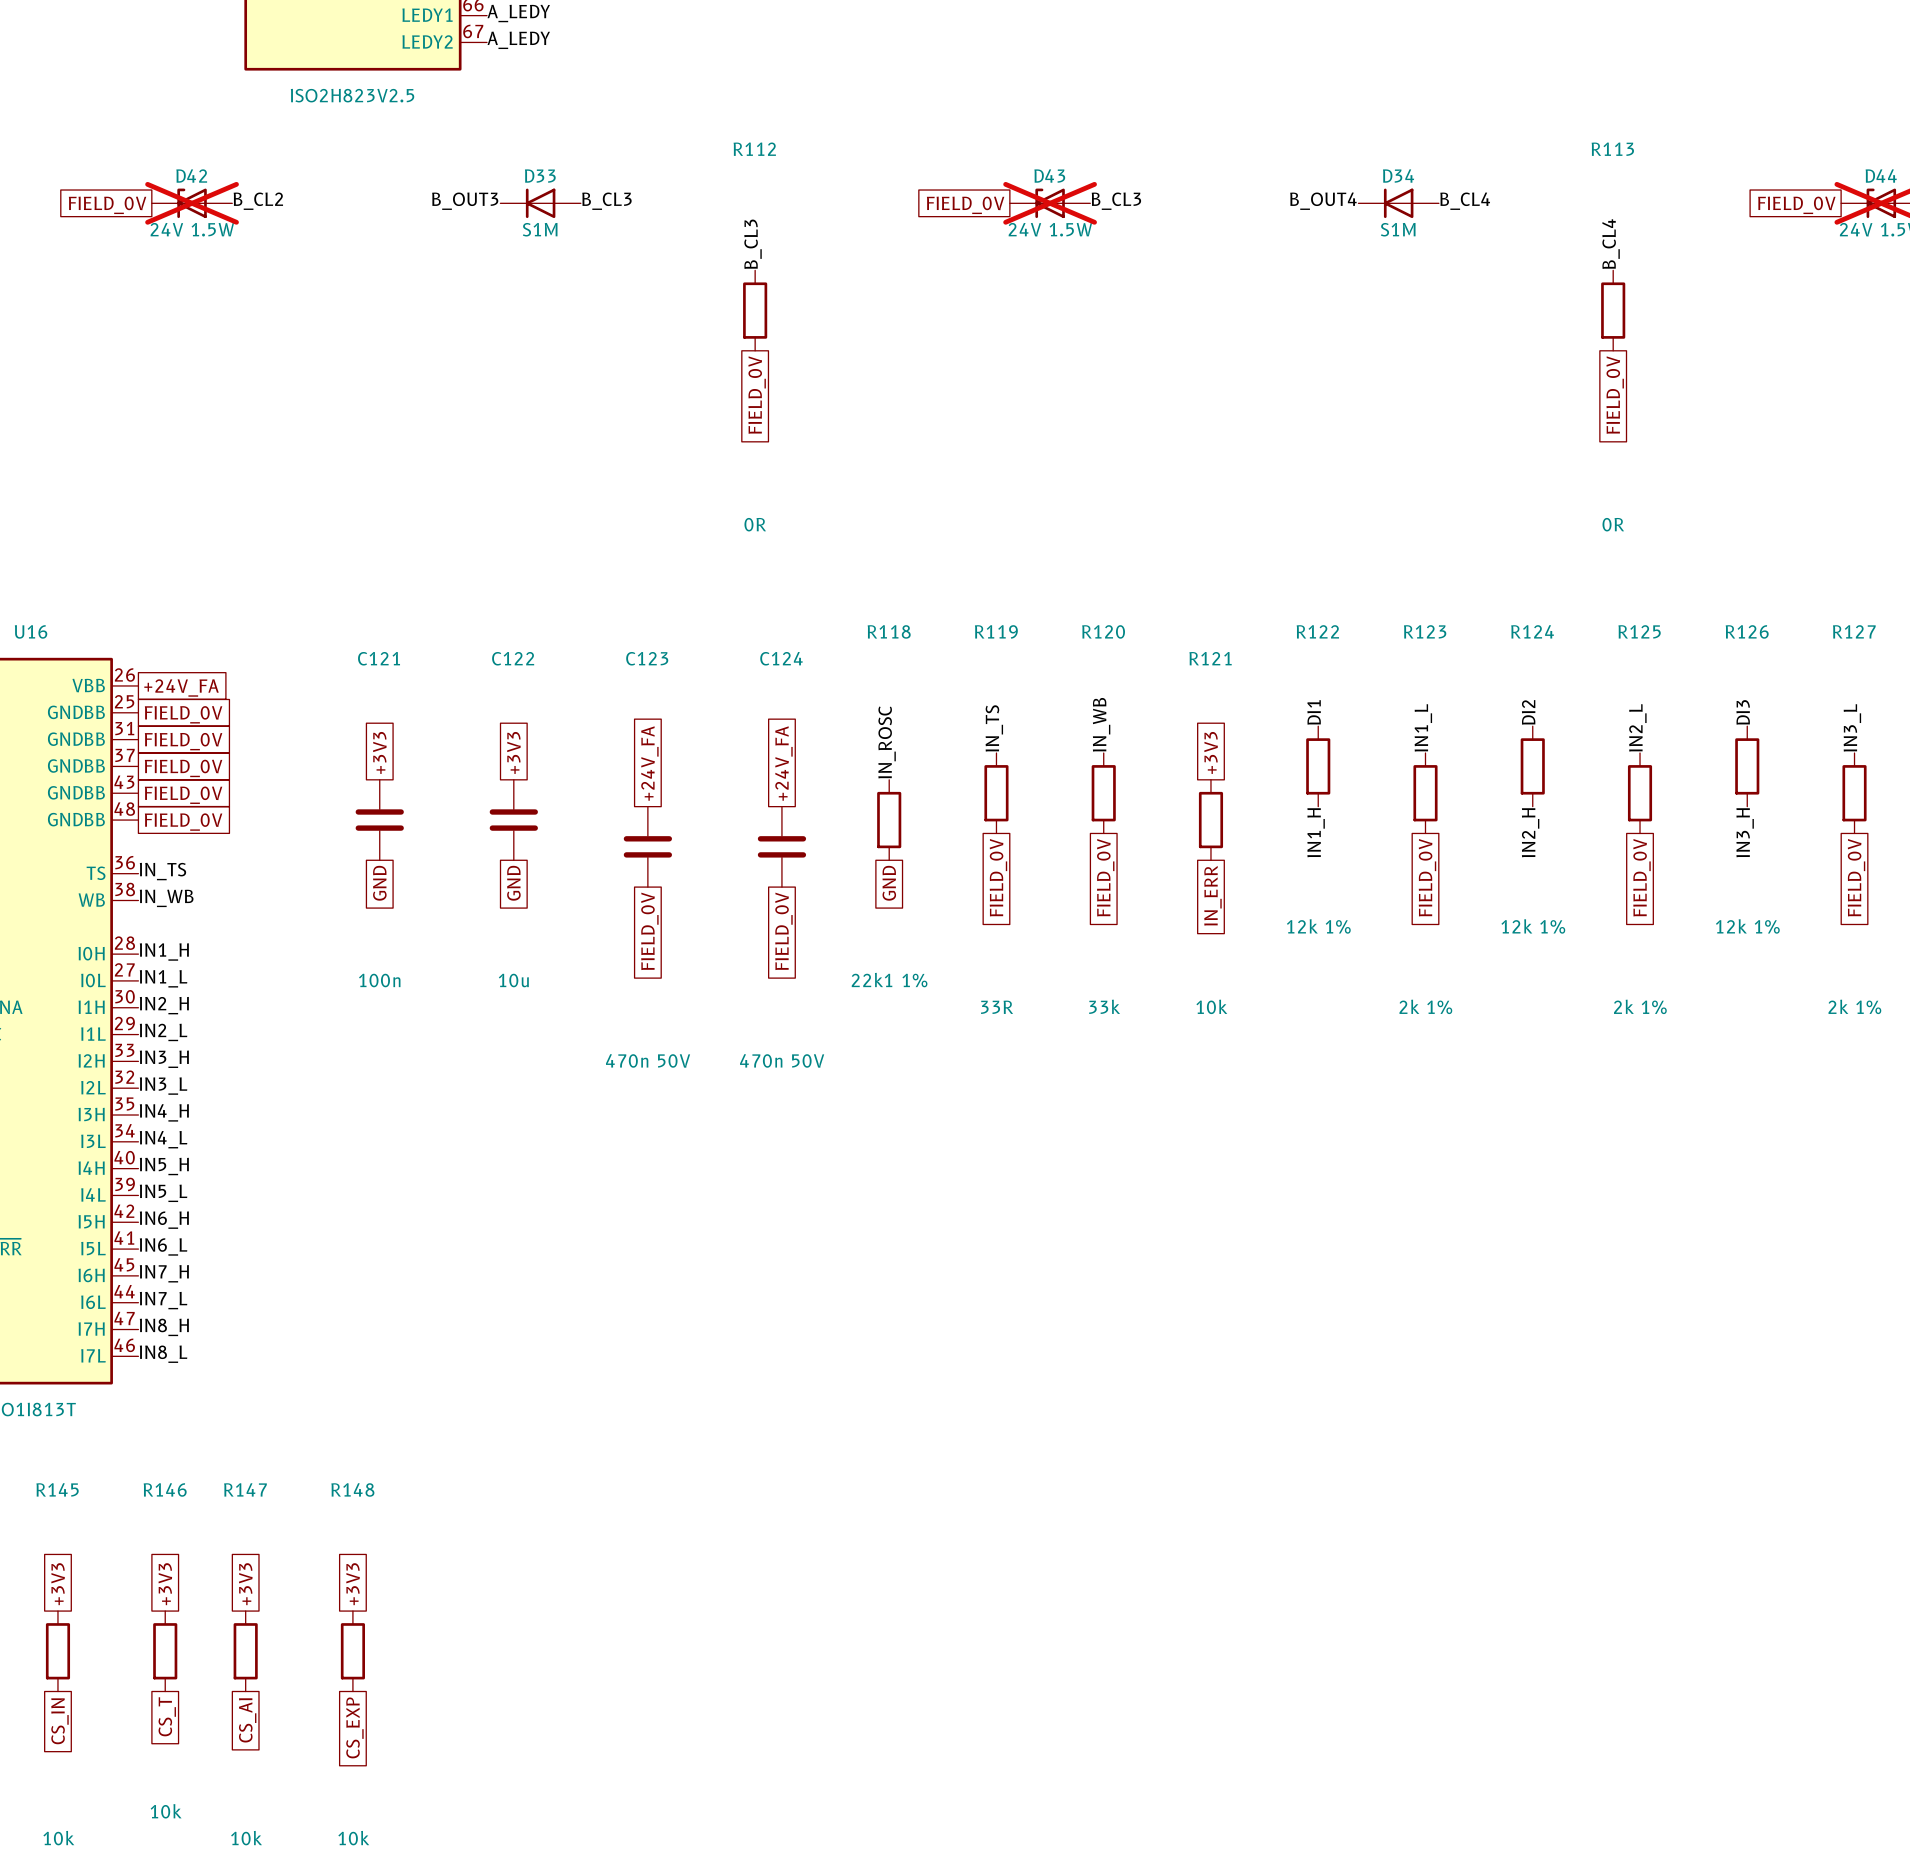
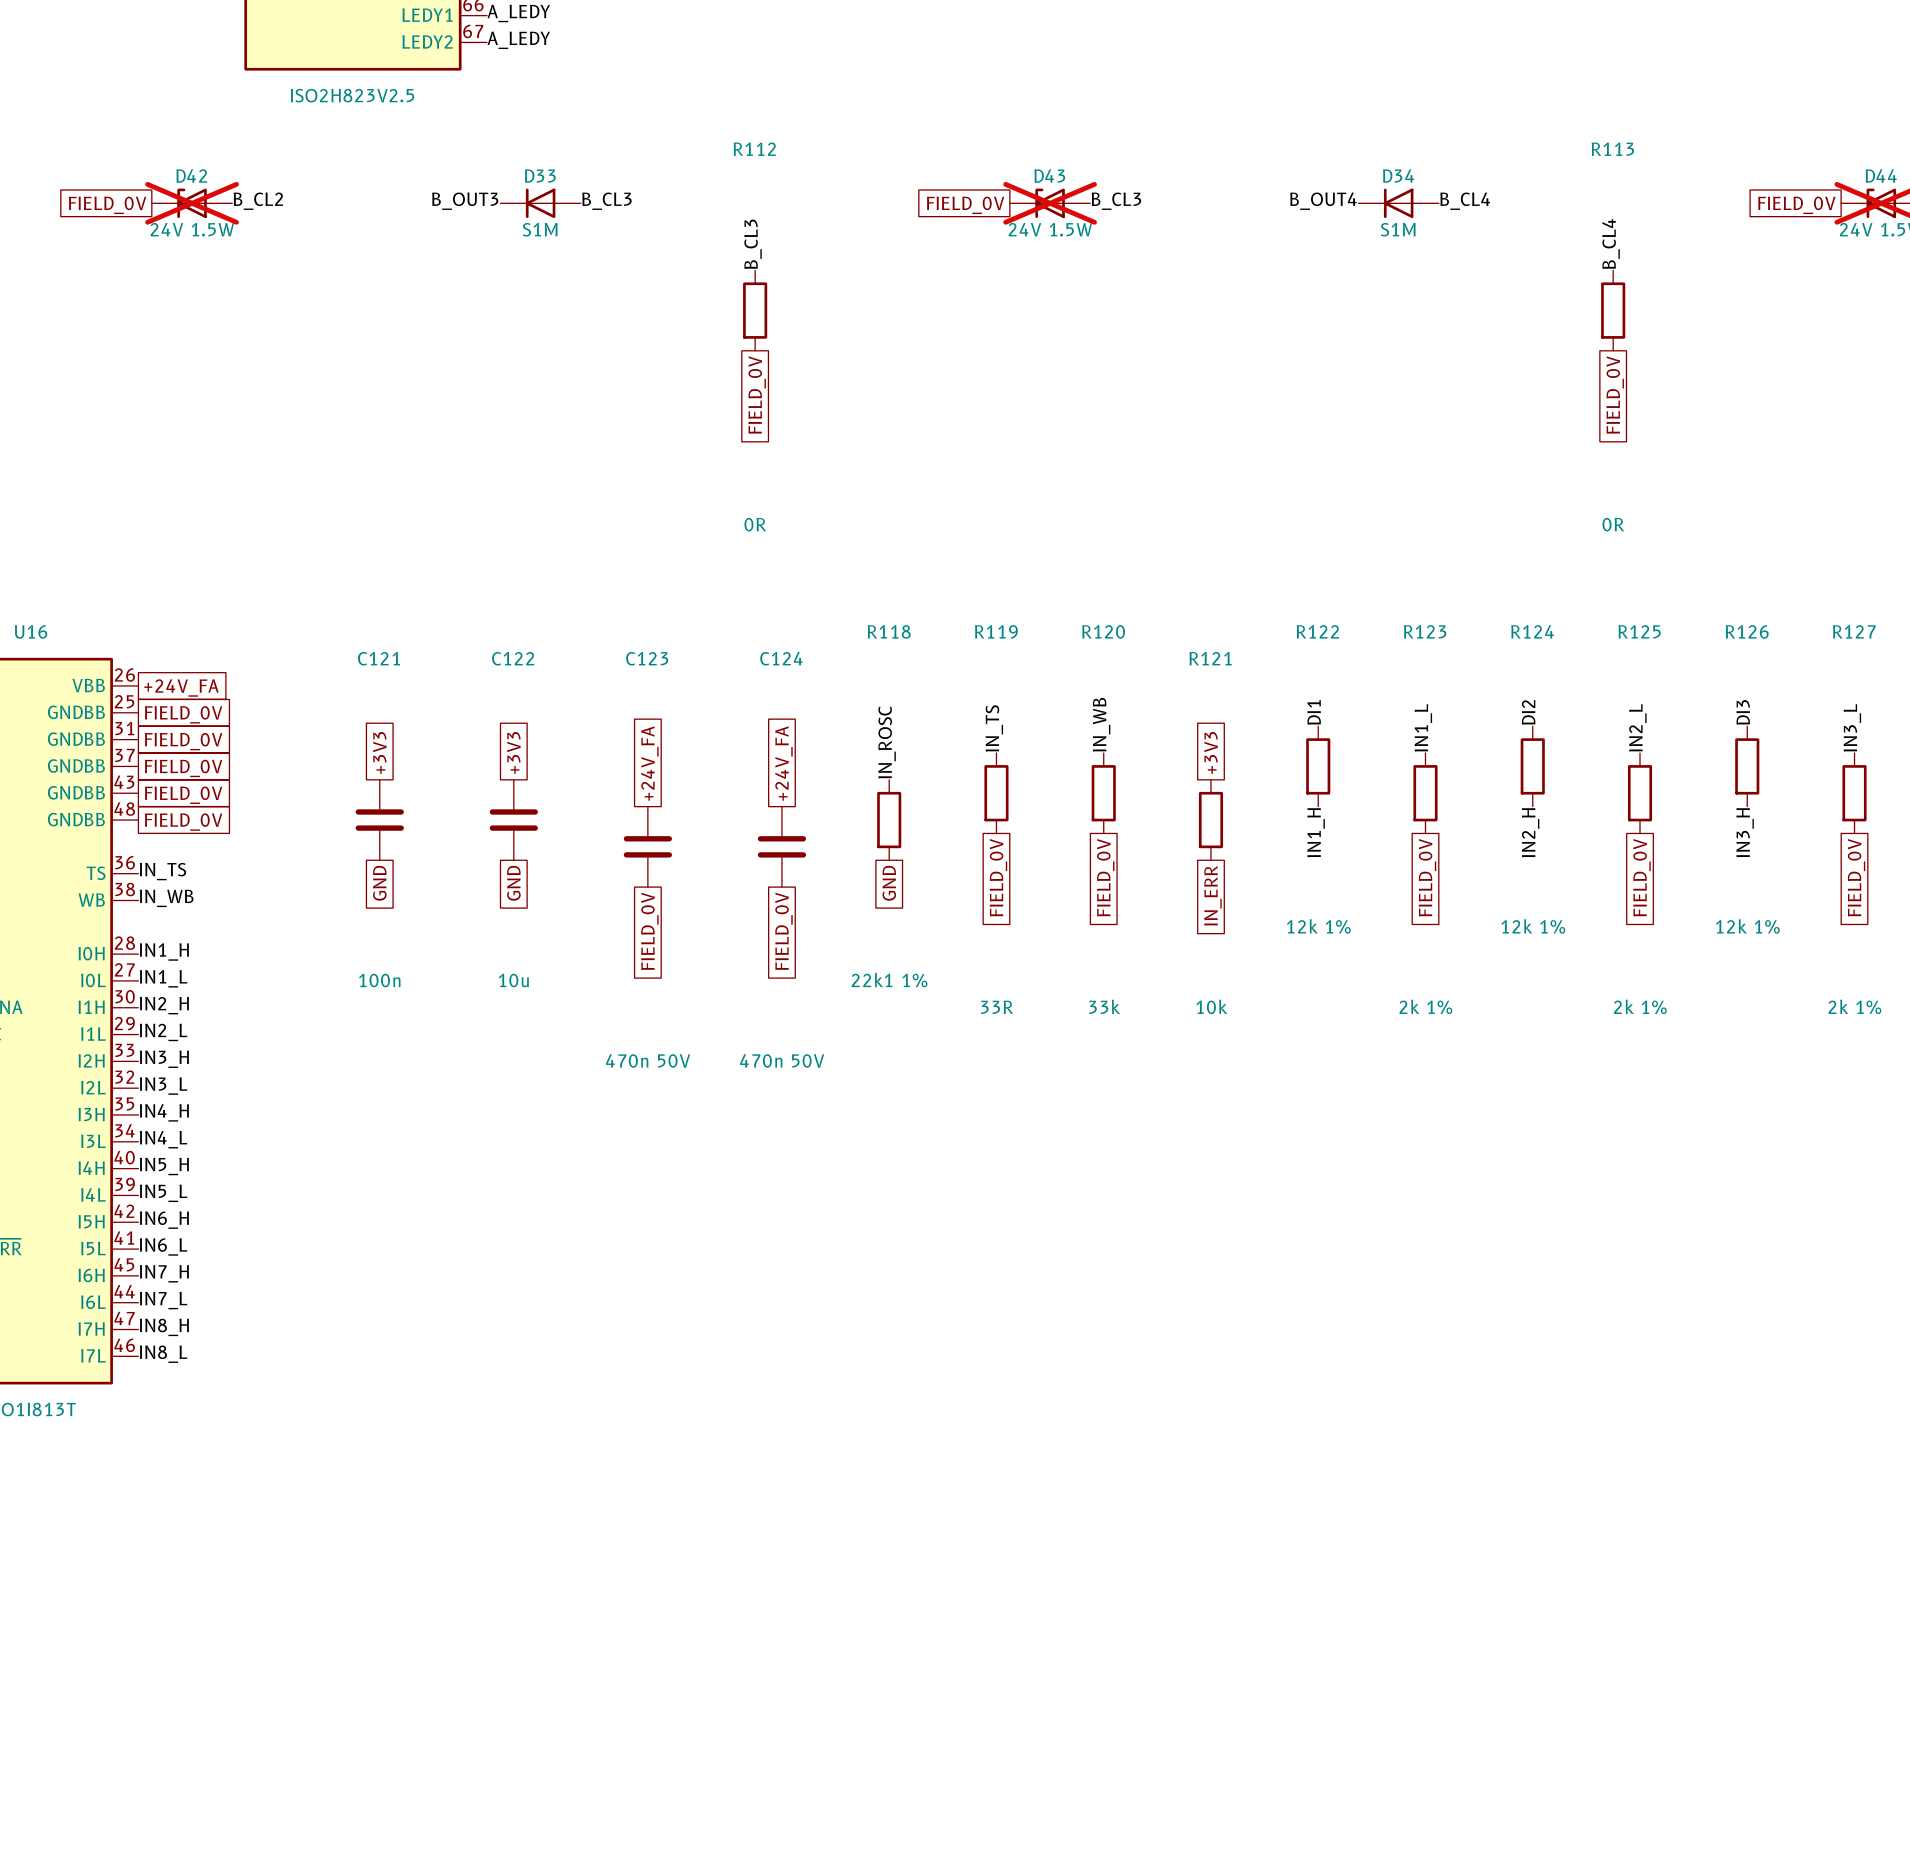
global label: +3V3 (58, 1584) -> none
global label: +3V3 (165, 1584) -> none
global label: +3V3 (245, 1584) -> none
global label: +3V3 (353, 1584) -> none
R145: 10k (57, 1651) -> none
R146: 10k (165, 1651) -> none
R147: 10k (245, 1651) -> none
R148: 10k (352, 1651) -> none
global label: CS_T (167, 1716) -> none
global label: CS_AI (247, 1720) -> none
global label: CS_IN (59, 1721) -> none
global label: CS_EXP (354, 1727) -> none

